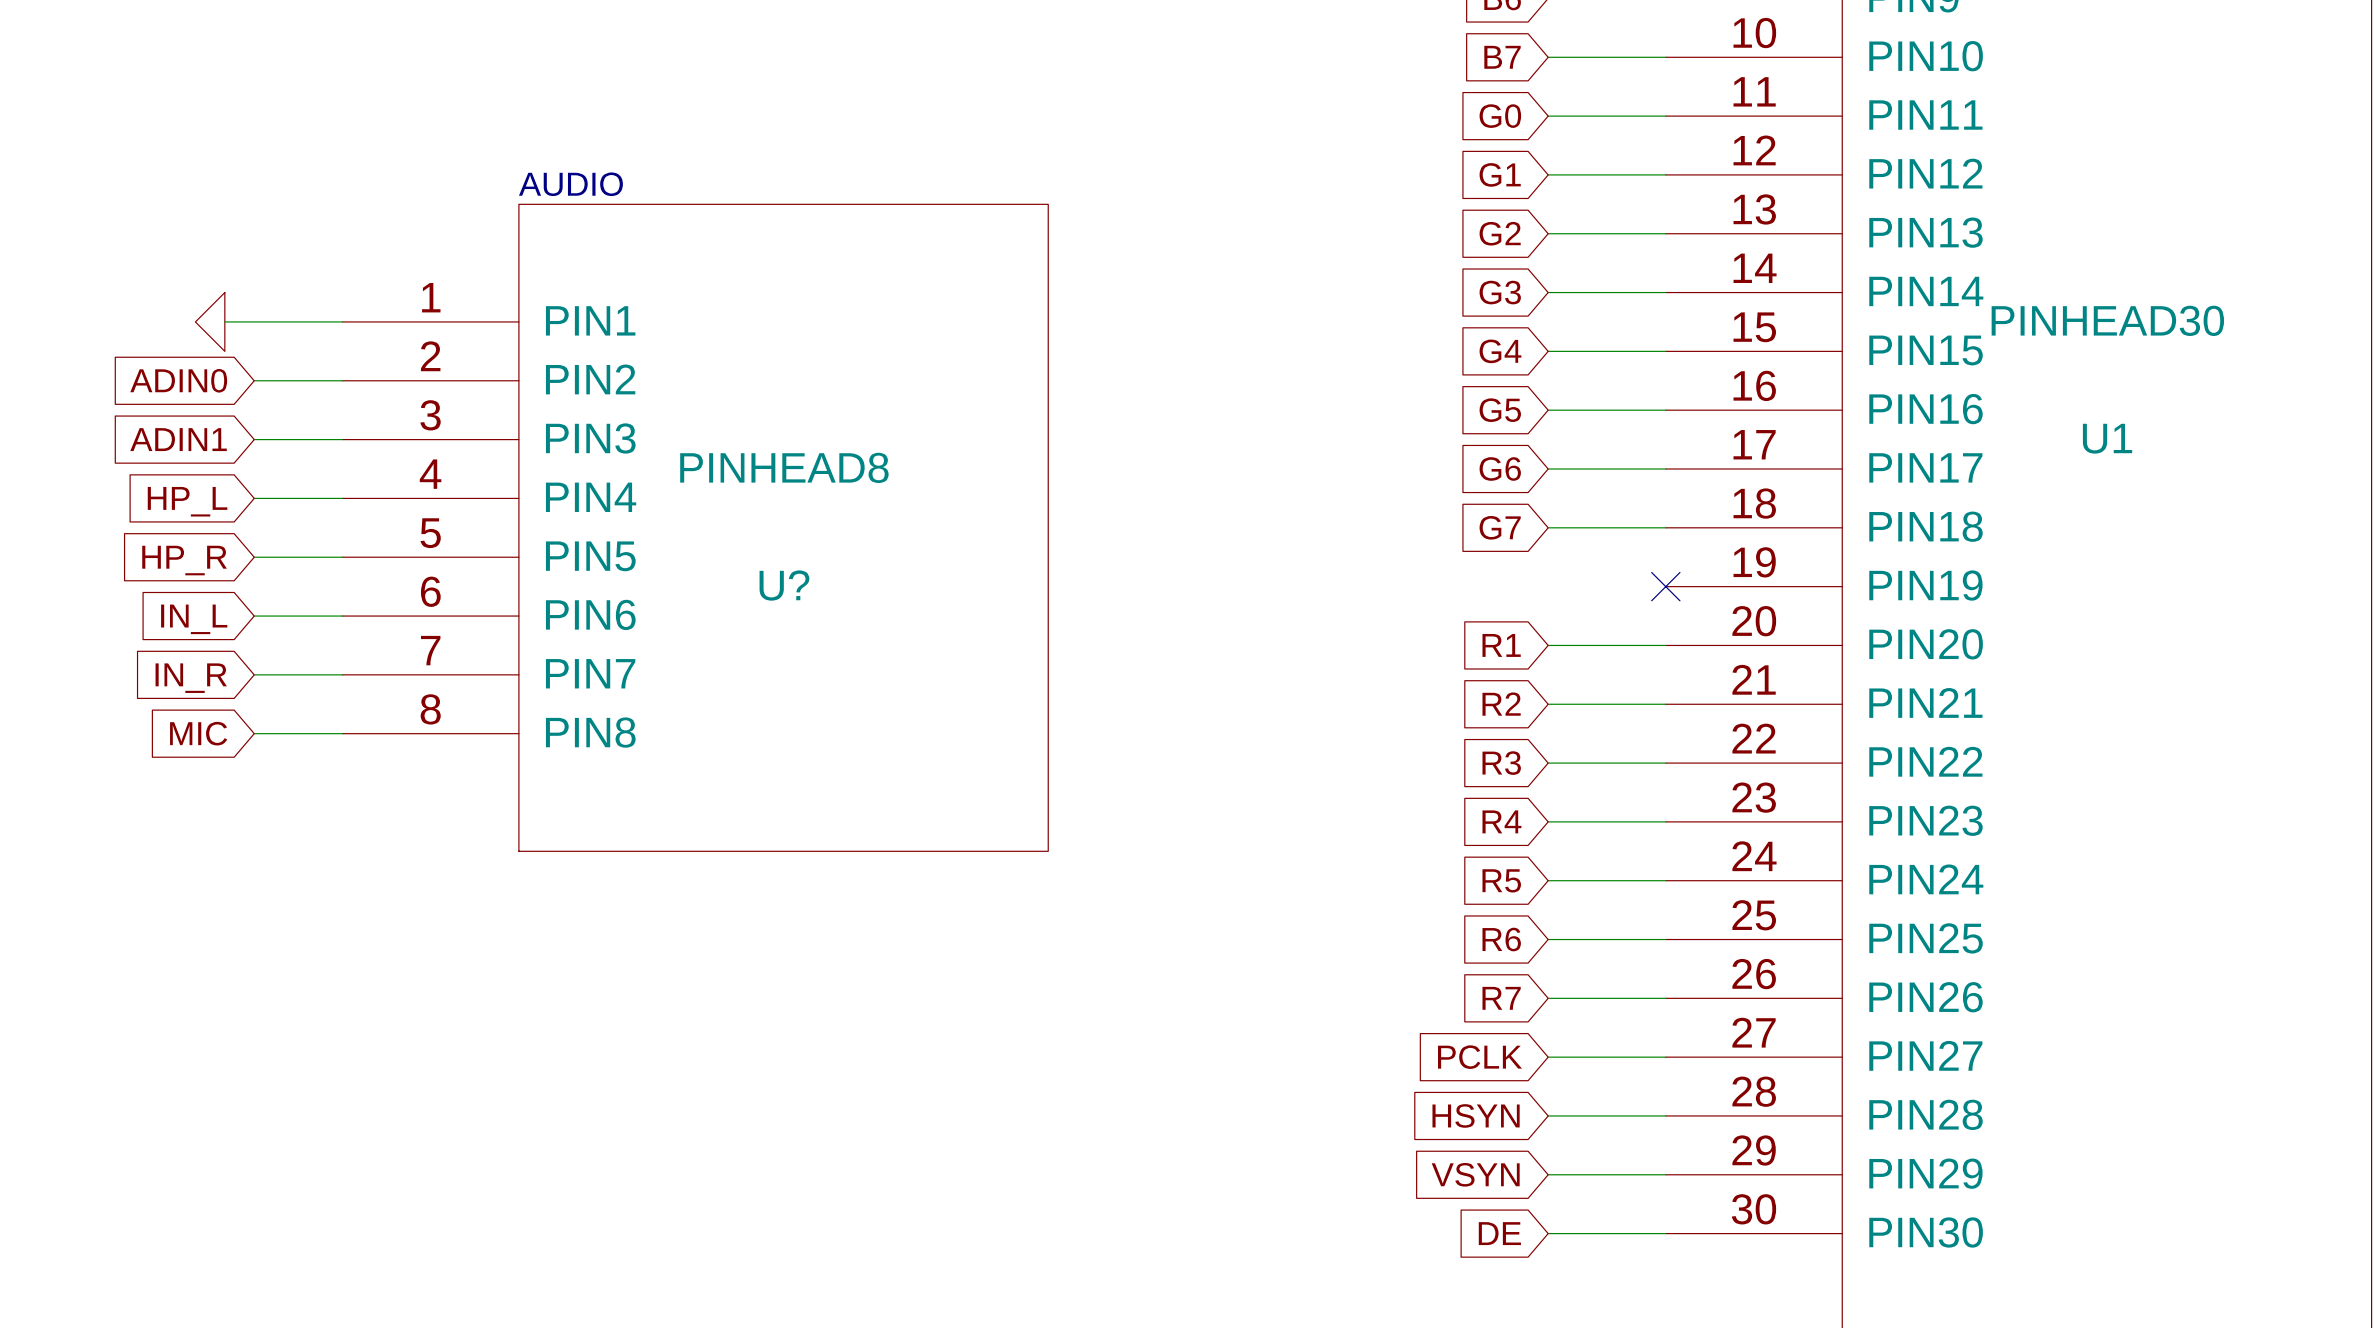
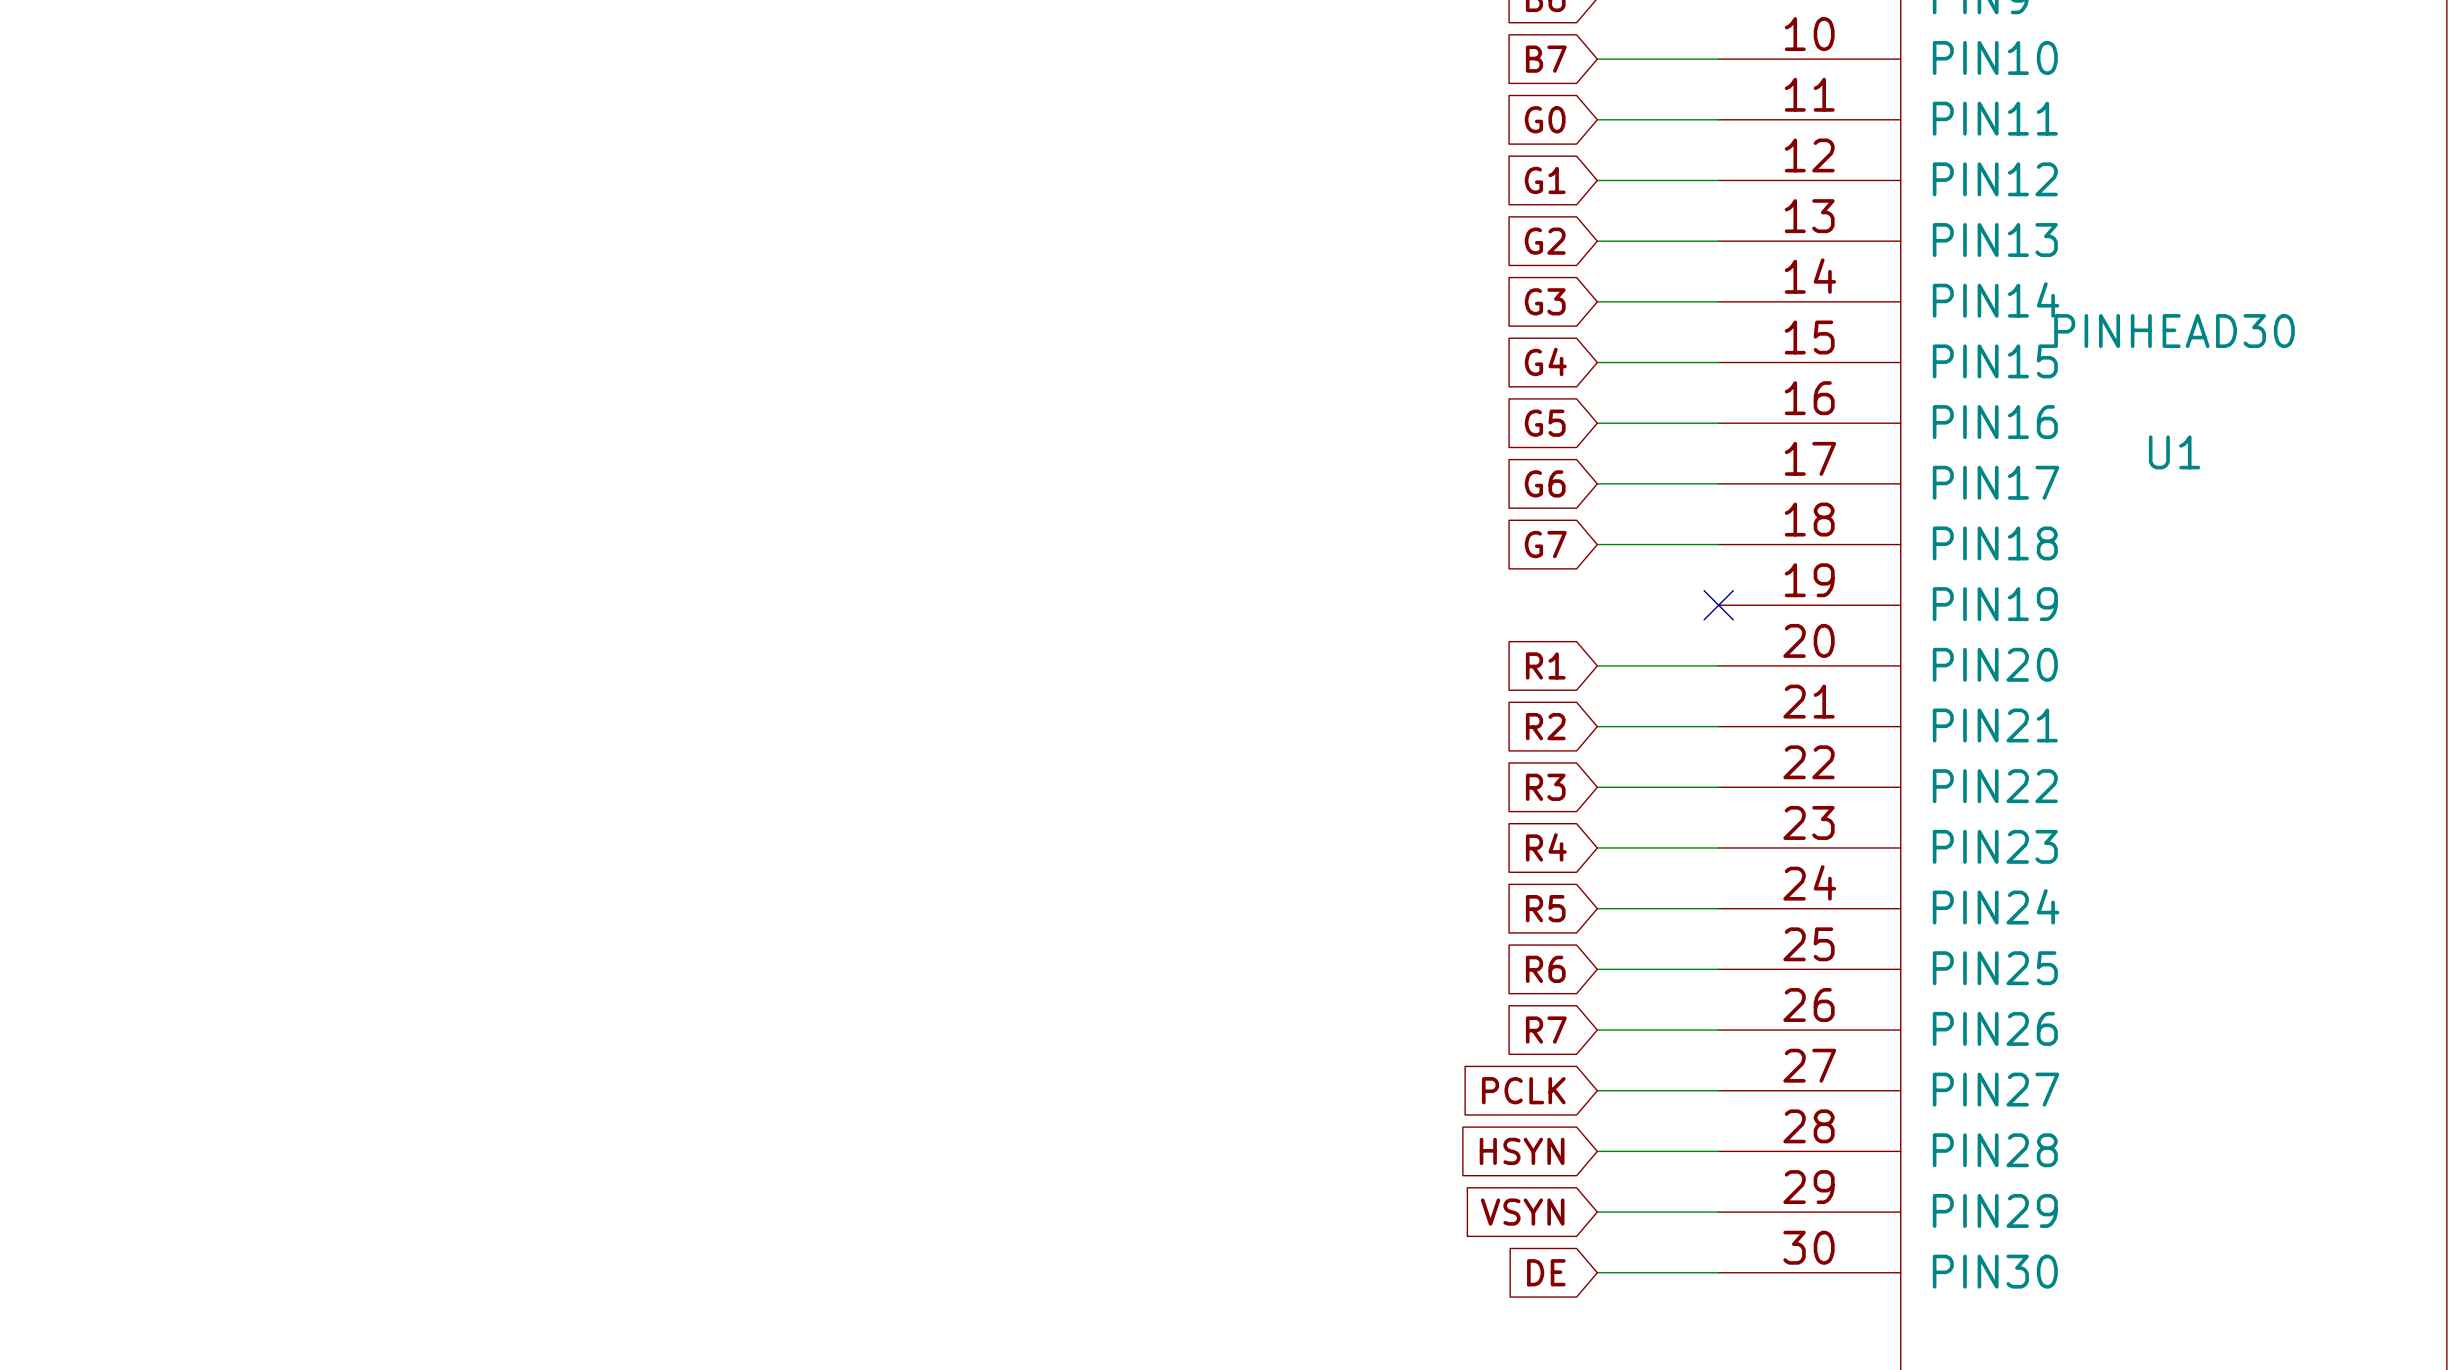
text: AUDIO (570, 184) -> none
power symbol: (210, 321) -> none
wire: (224, 321) (342, 321) -> none
global label: ADIN0 (178, 380) -> none
wire: (254, 380) (342, 380) -> none
global label: ADIN1 (178, 439) -> none
wire: (254, 439) (342, 439) -> none
wire: (254, 498) (342, 498) -> none
global label: HP_L (187, 501) -> none
U?: PINHEAD8 (695, 527) -> none
wire: (254, 557) (342, 557) -> none
global label: HP_R (184, 560) -> none
wire: (254, 616) (342, 616) -> none
global label: IN_L (194, 619) -> none
wire: (254, 674) (342, 674) -> none
global label: IN_R (191, 678) -> none
global label: MIC (198, 733) -> none
wire: (254, 733) (342, 733) -> none

